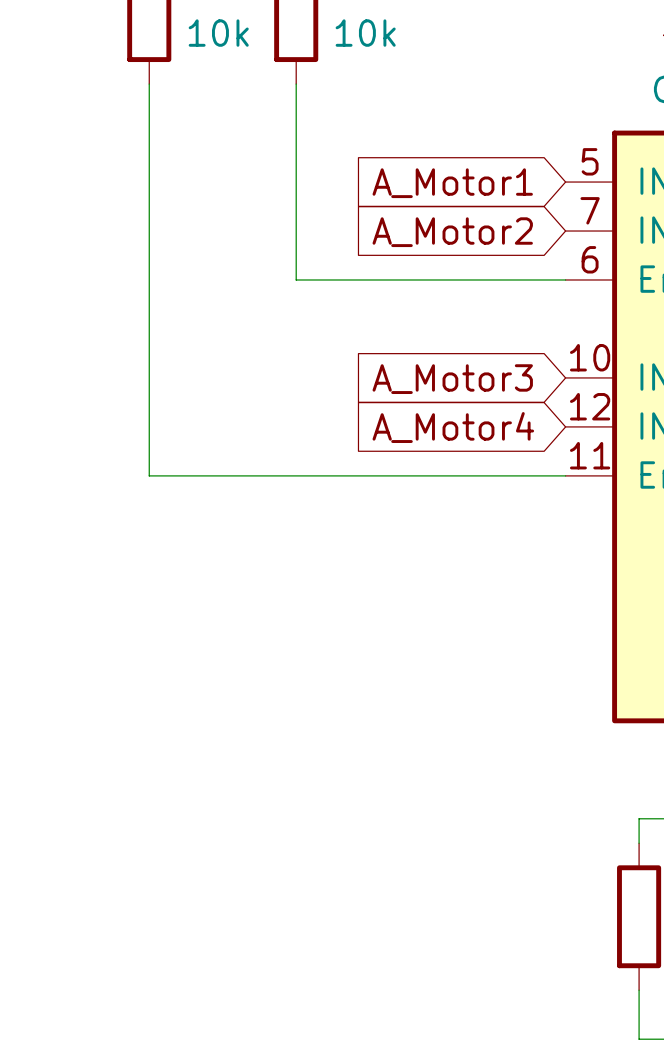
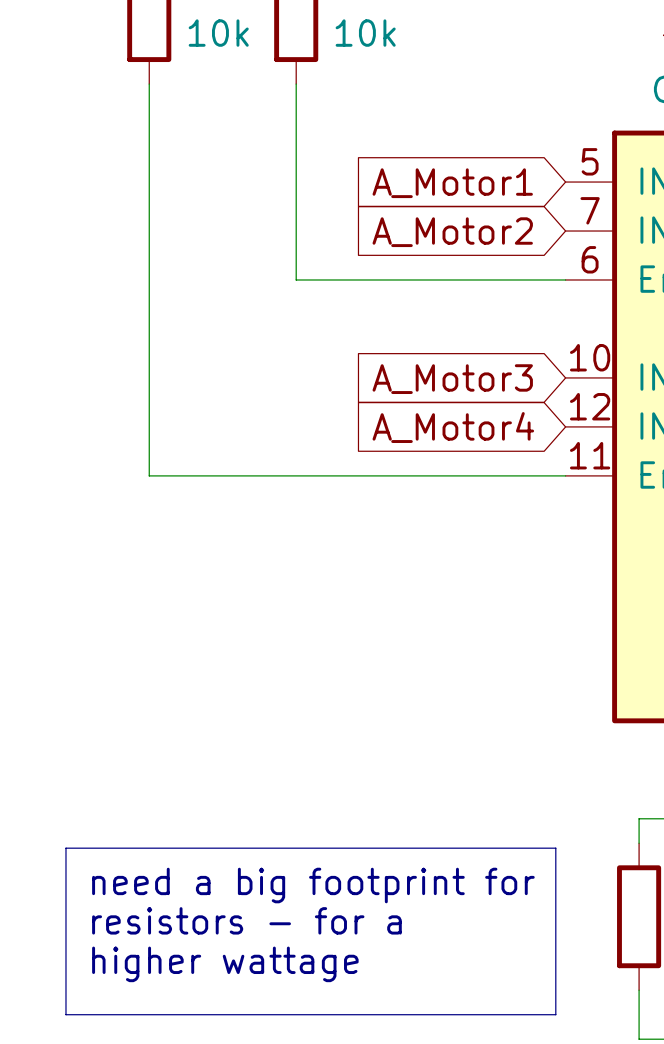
line: none -> (65, 848) (555, 848) (555, 1014) (65, 1014) (65, 848)
text: none -> need a big footprint for (313, 885)
text: none -> resistors - for a (246, 920)
text: none -> higher wattage (225, 964)

